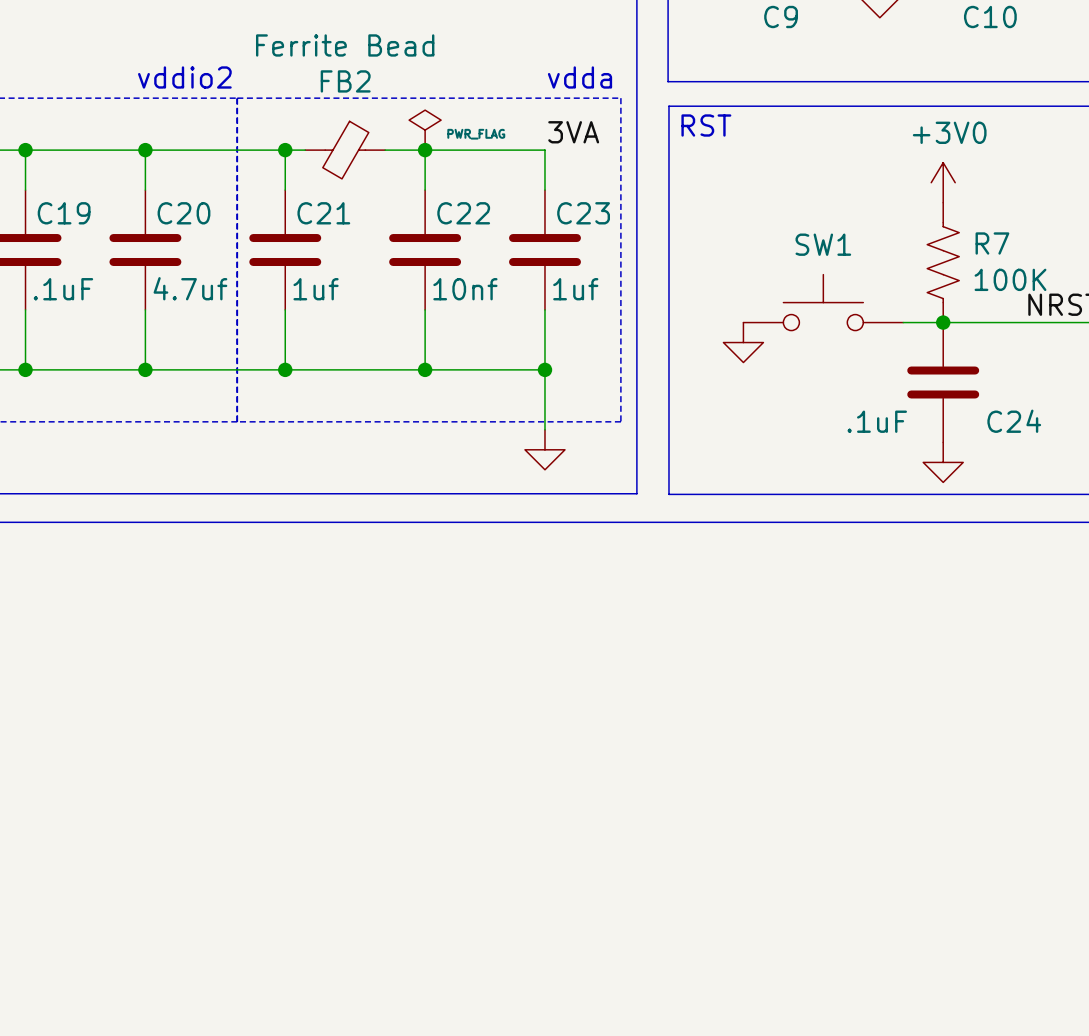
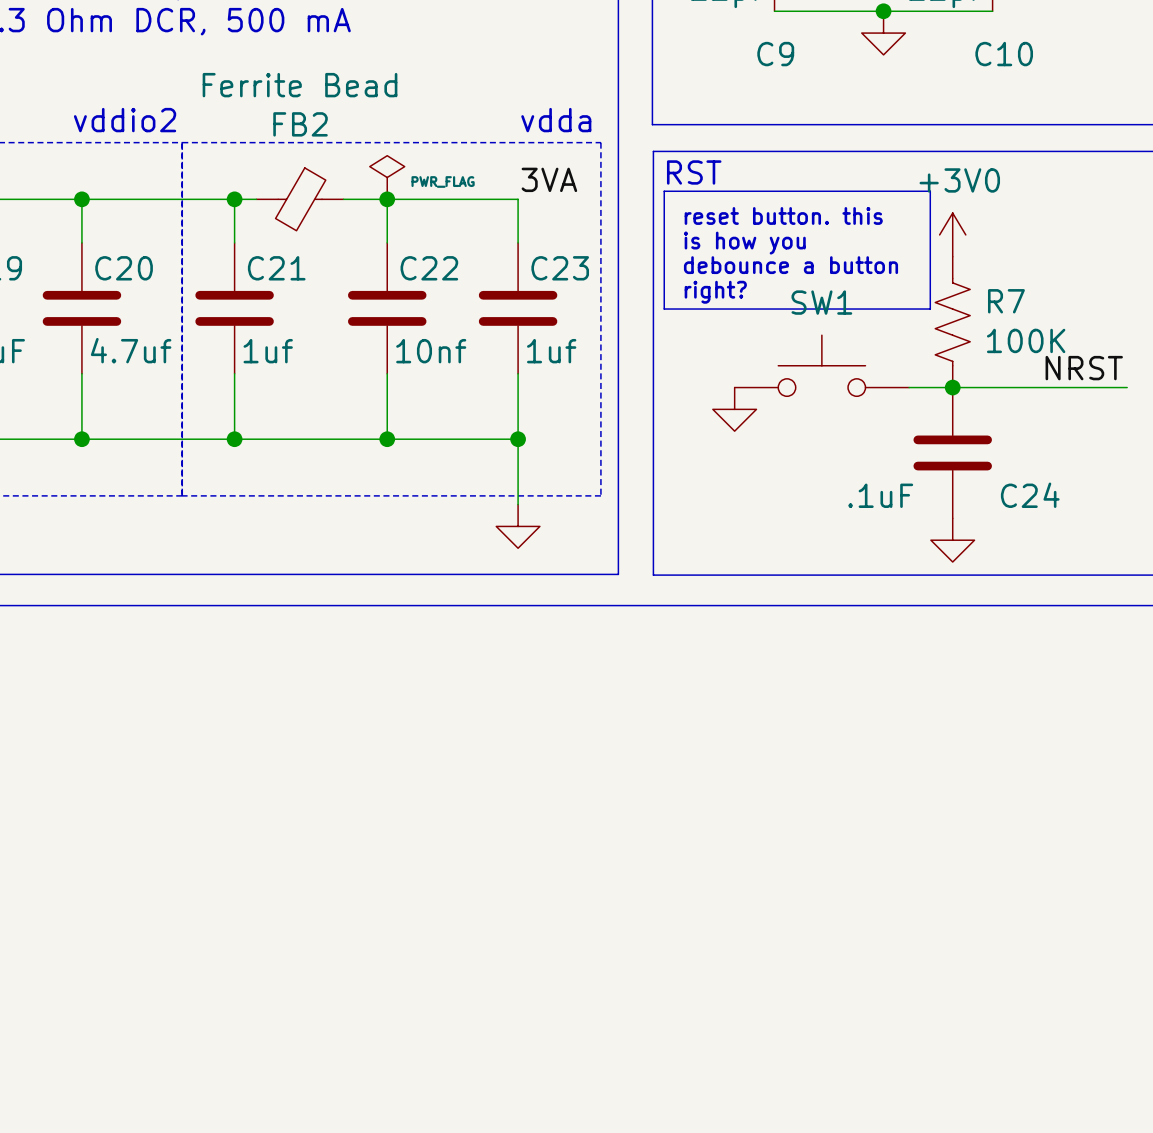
line: none -> (664, 191) (930, 191) (930, 309) (664, 309) (664, 191)
text: none -> reset button. this (783, 215)
text: none -> is how you (744, 243)
text: none -> debounce a button (790, 265)
text: none -> right? (715, 292)

